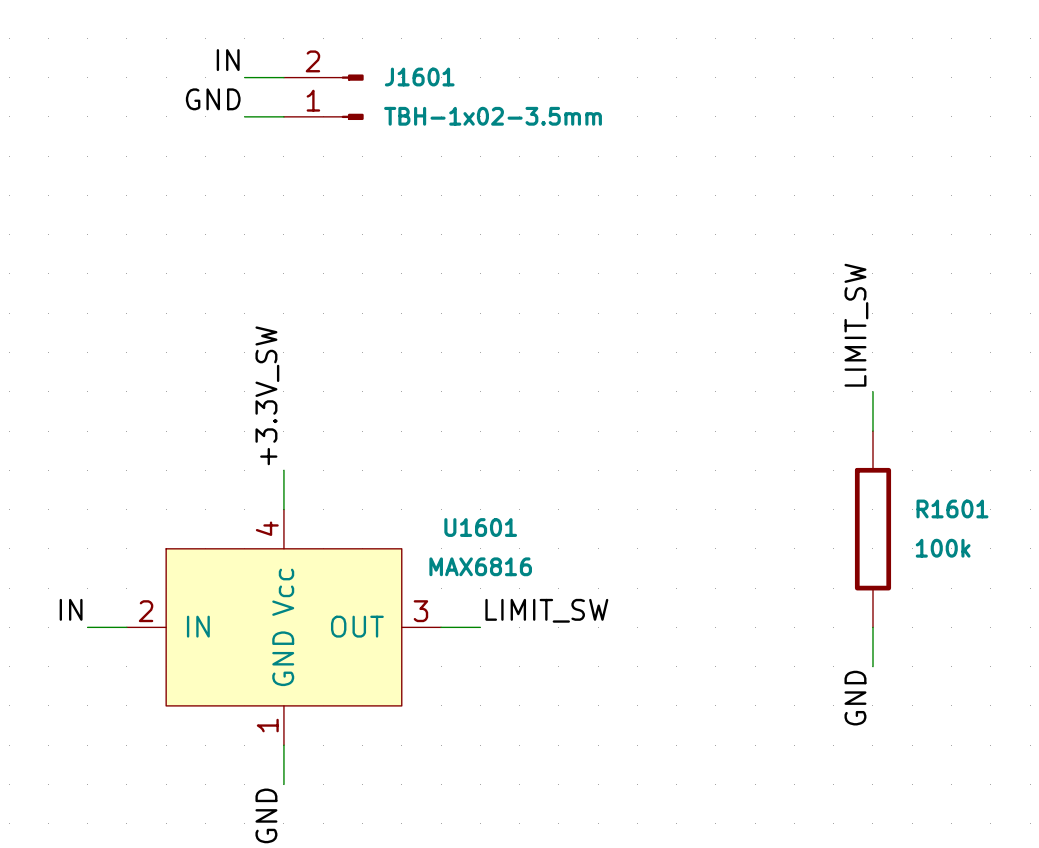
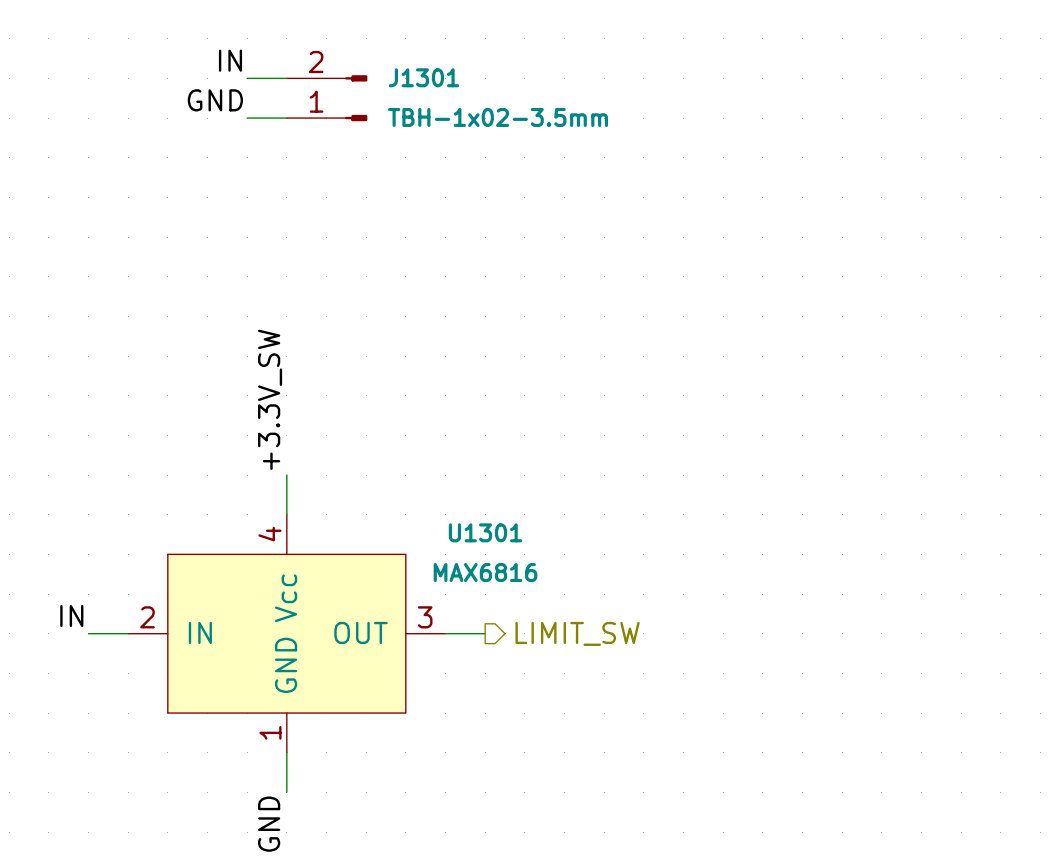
J1601 name: J1601 (419, 77) -> J1301 (423, 77)
label: LIMIT_SW (856, 325) -> none
wire: (872, 391) (872, 431) -> none
U1601 name: U1601 (480, 527) -> U1301 (485, 532)
R1601: 100k (872, 529) -> none
label: LIMIT_SW (546, 610) -> none
hierarchical label: none -> LIMIT_SW (577, 633)
wire: (872, 627) (872, 666) -> none
label: GND (855, 698) -> none

